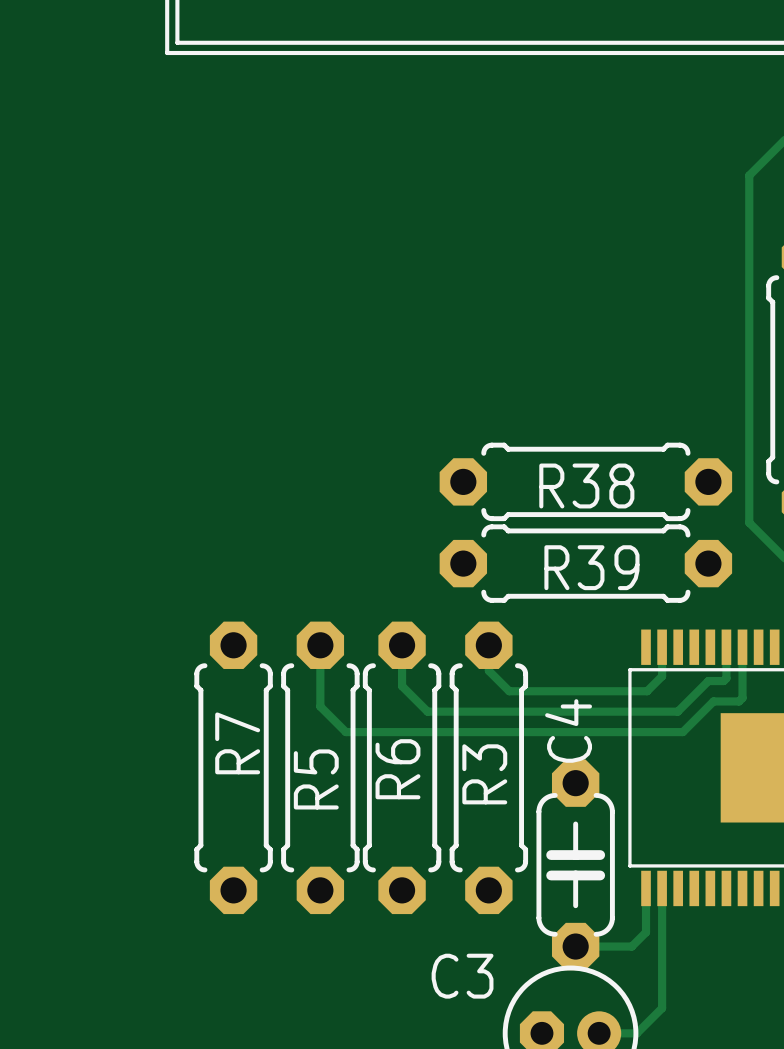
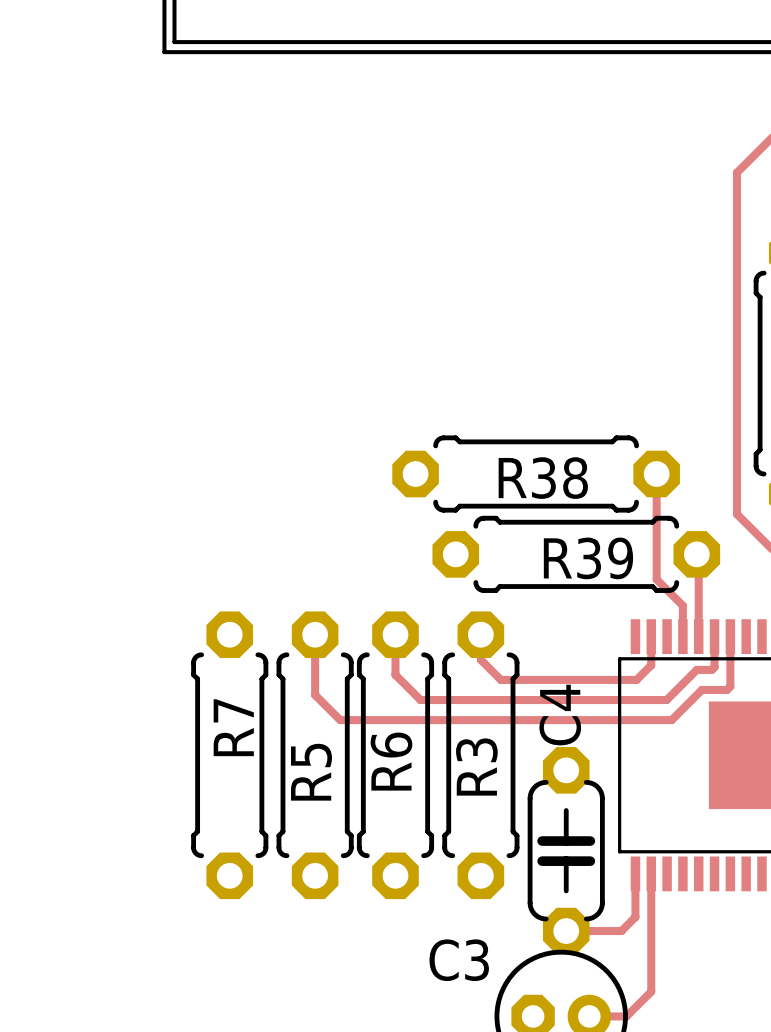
R38 position: (585, 481) -> (536, 474)
track: none -> (656, 474) (656, 579) (682, 605) (682, 636)
track: none -> (696, 554) (698, 556) (698, 636)

